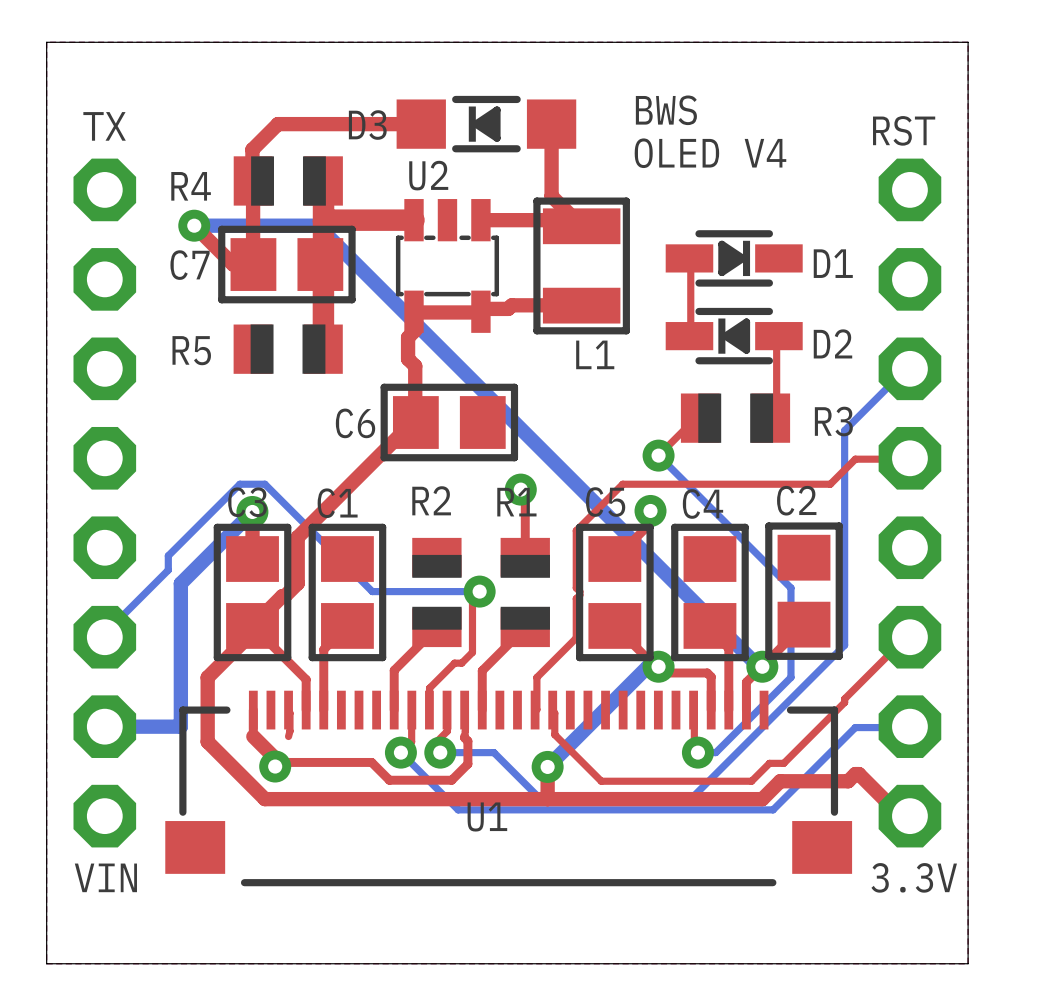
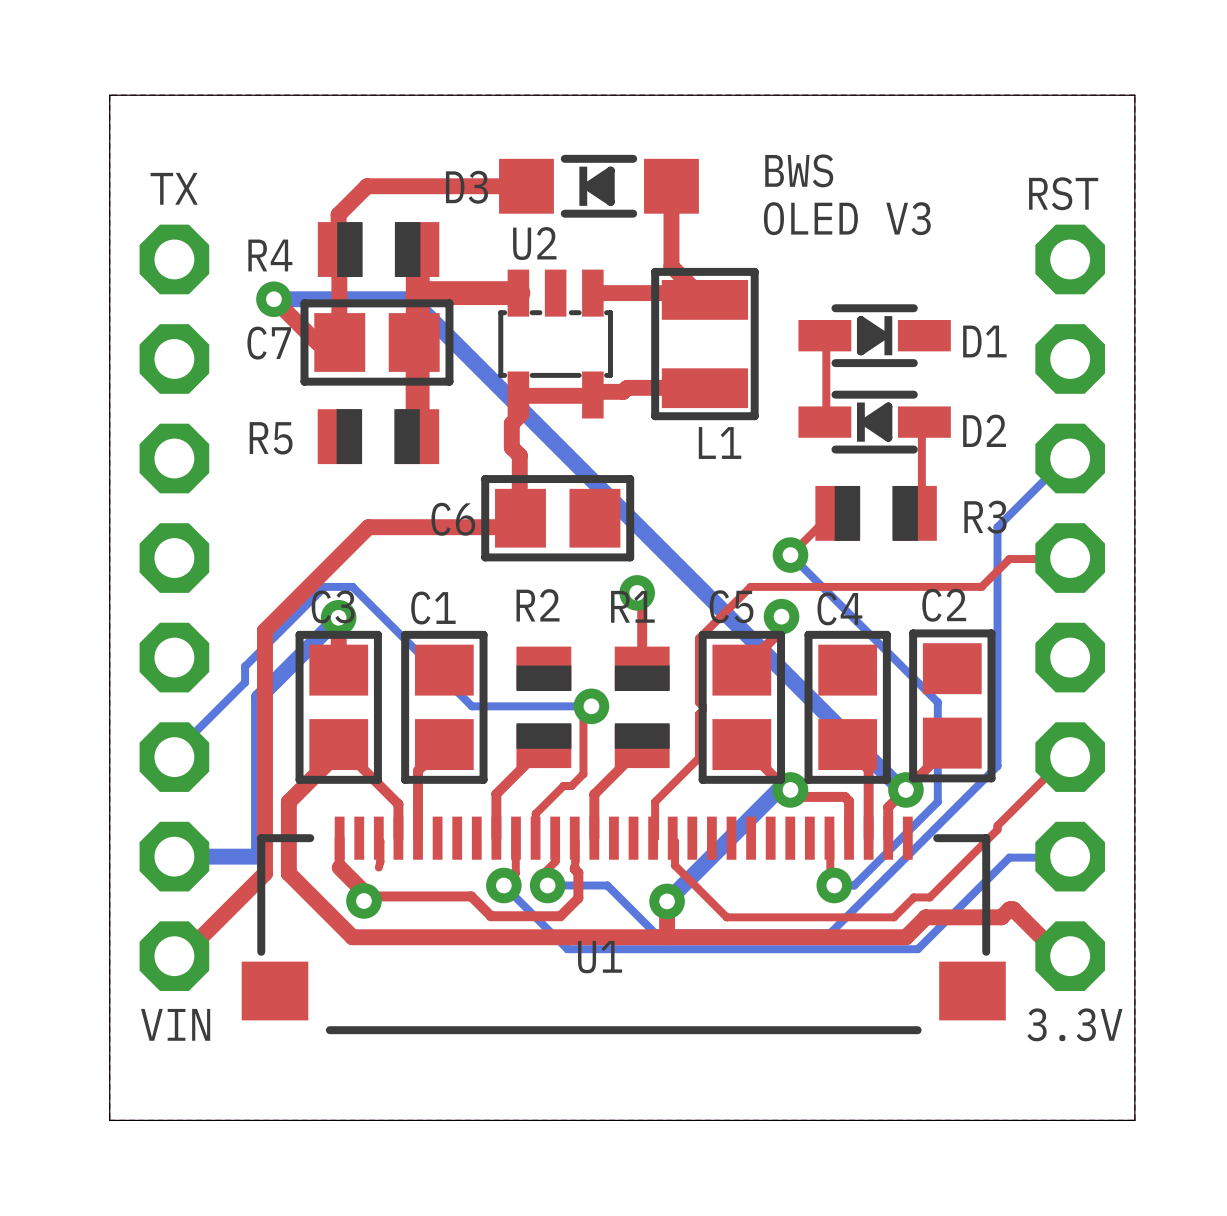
text: OLED V4 (710, 153) -> OLED V3 (847, 218)
top track: (415, 419) (297, 537) (297, 583) (252, 625) -> none
top track: none -> (520, 518) (511, 527) (368, 527) (264, 630) (264, 873) (185, 953) (177, 953) (174, 956)

